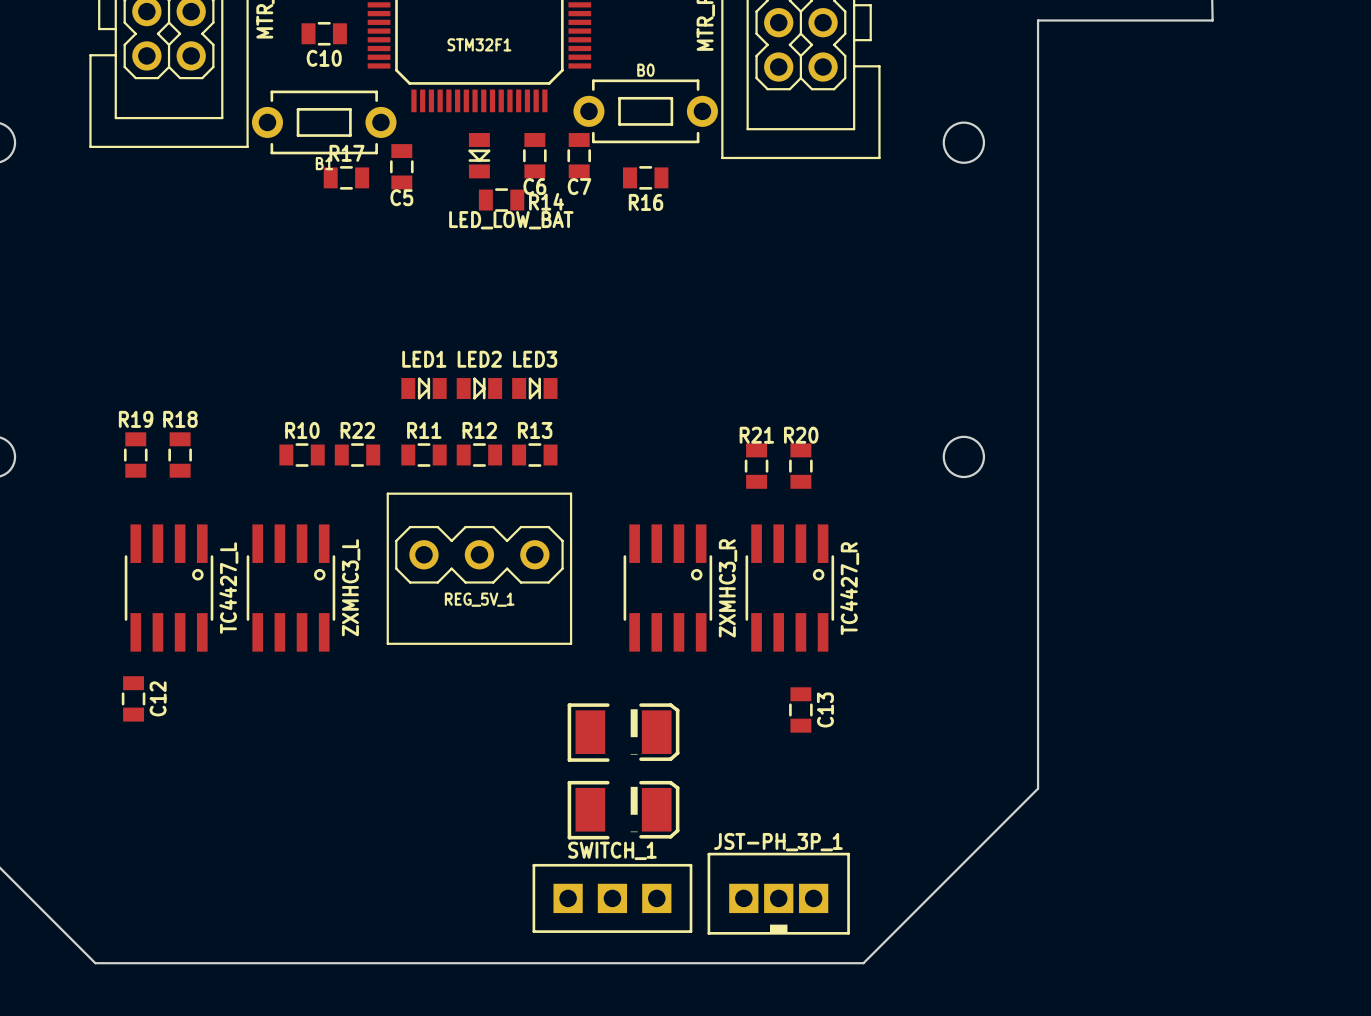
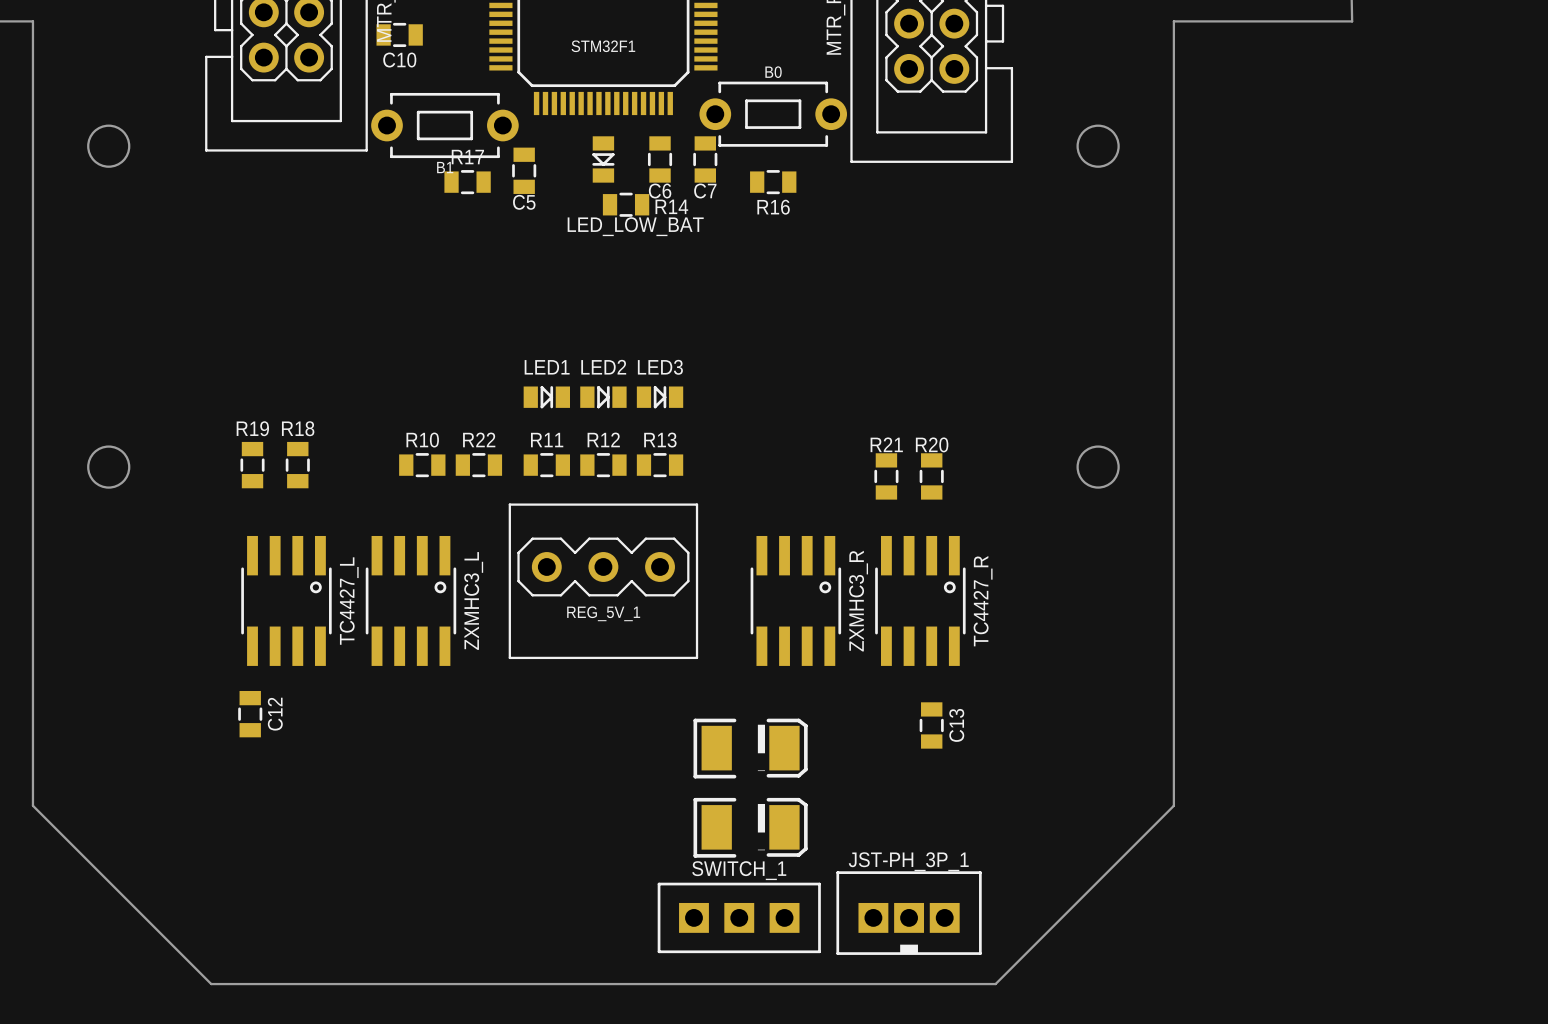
C10 position: (324, 33) -> (399, 34)

